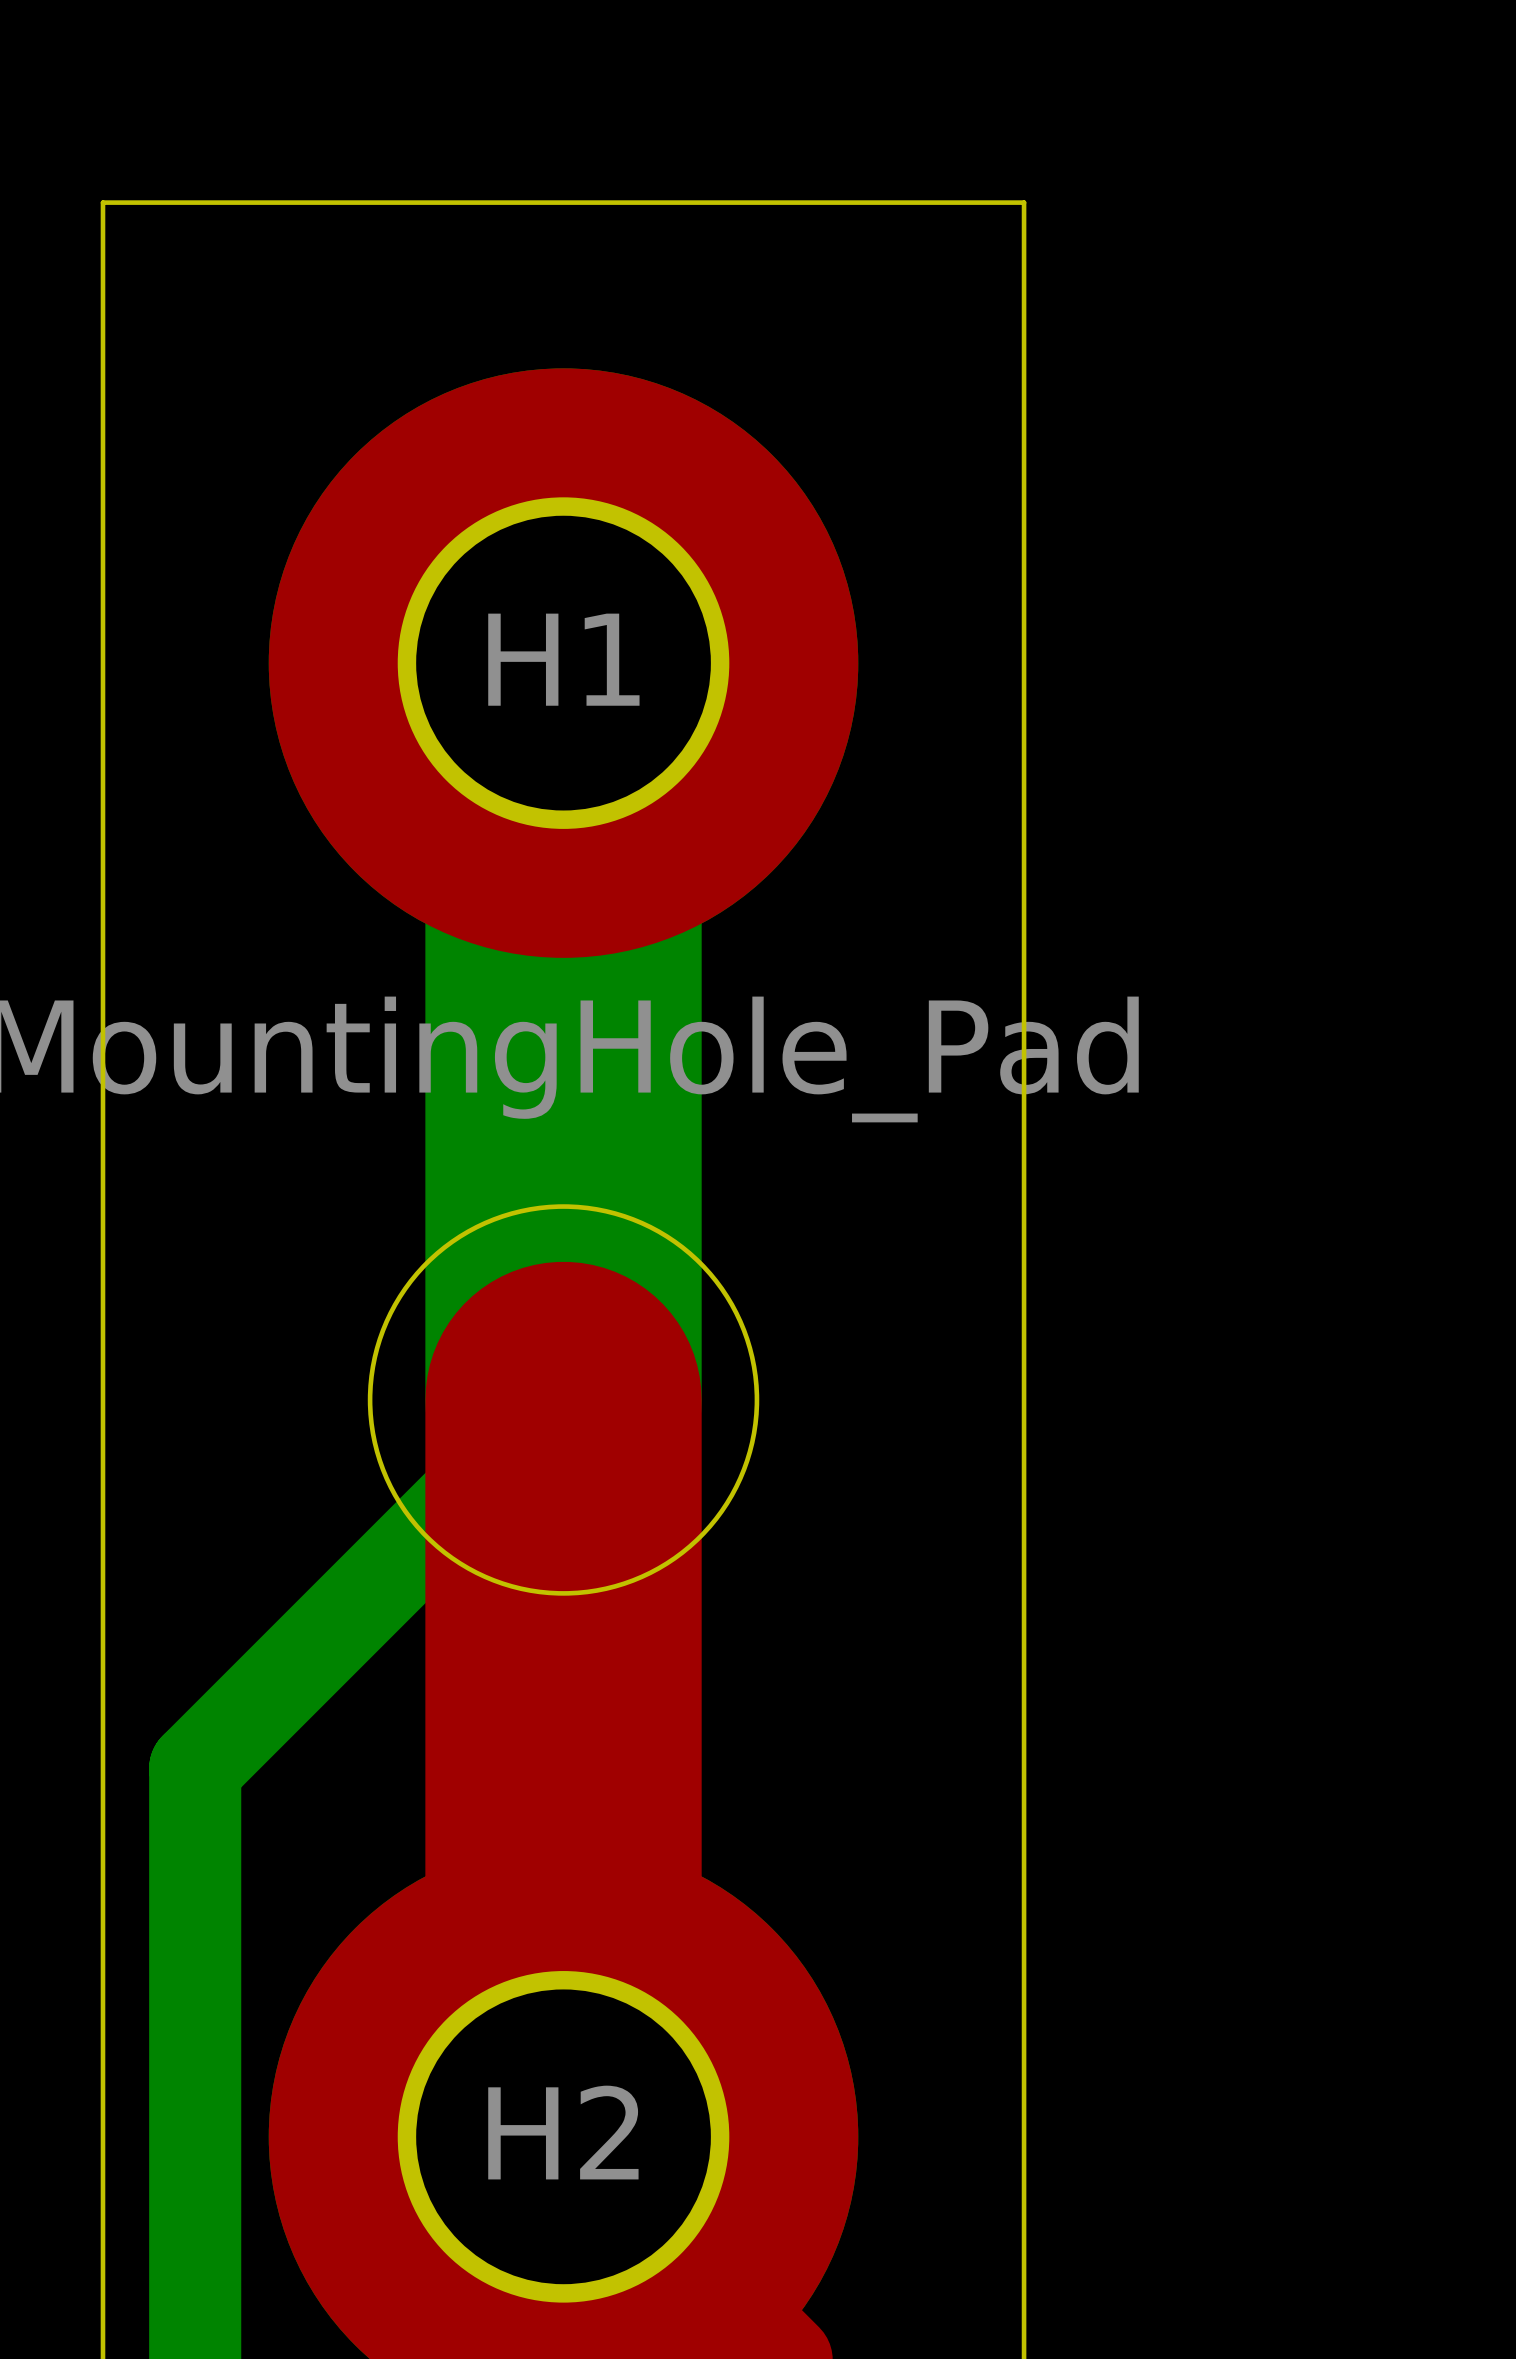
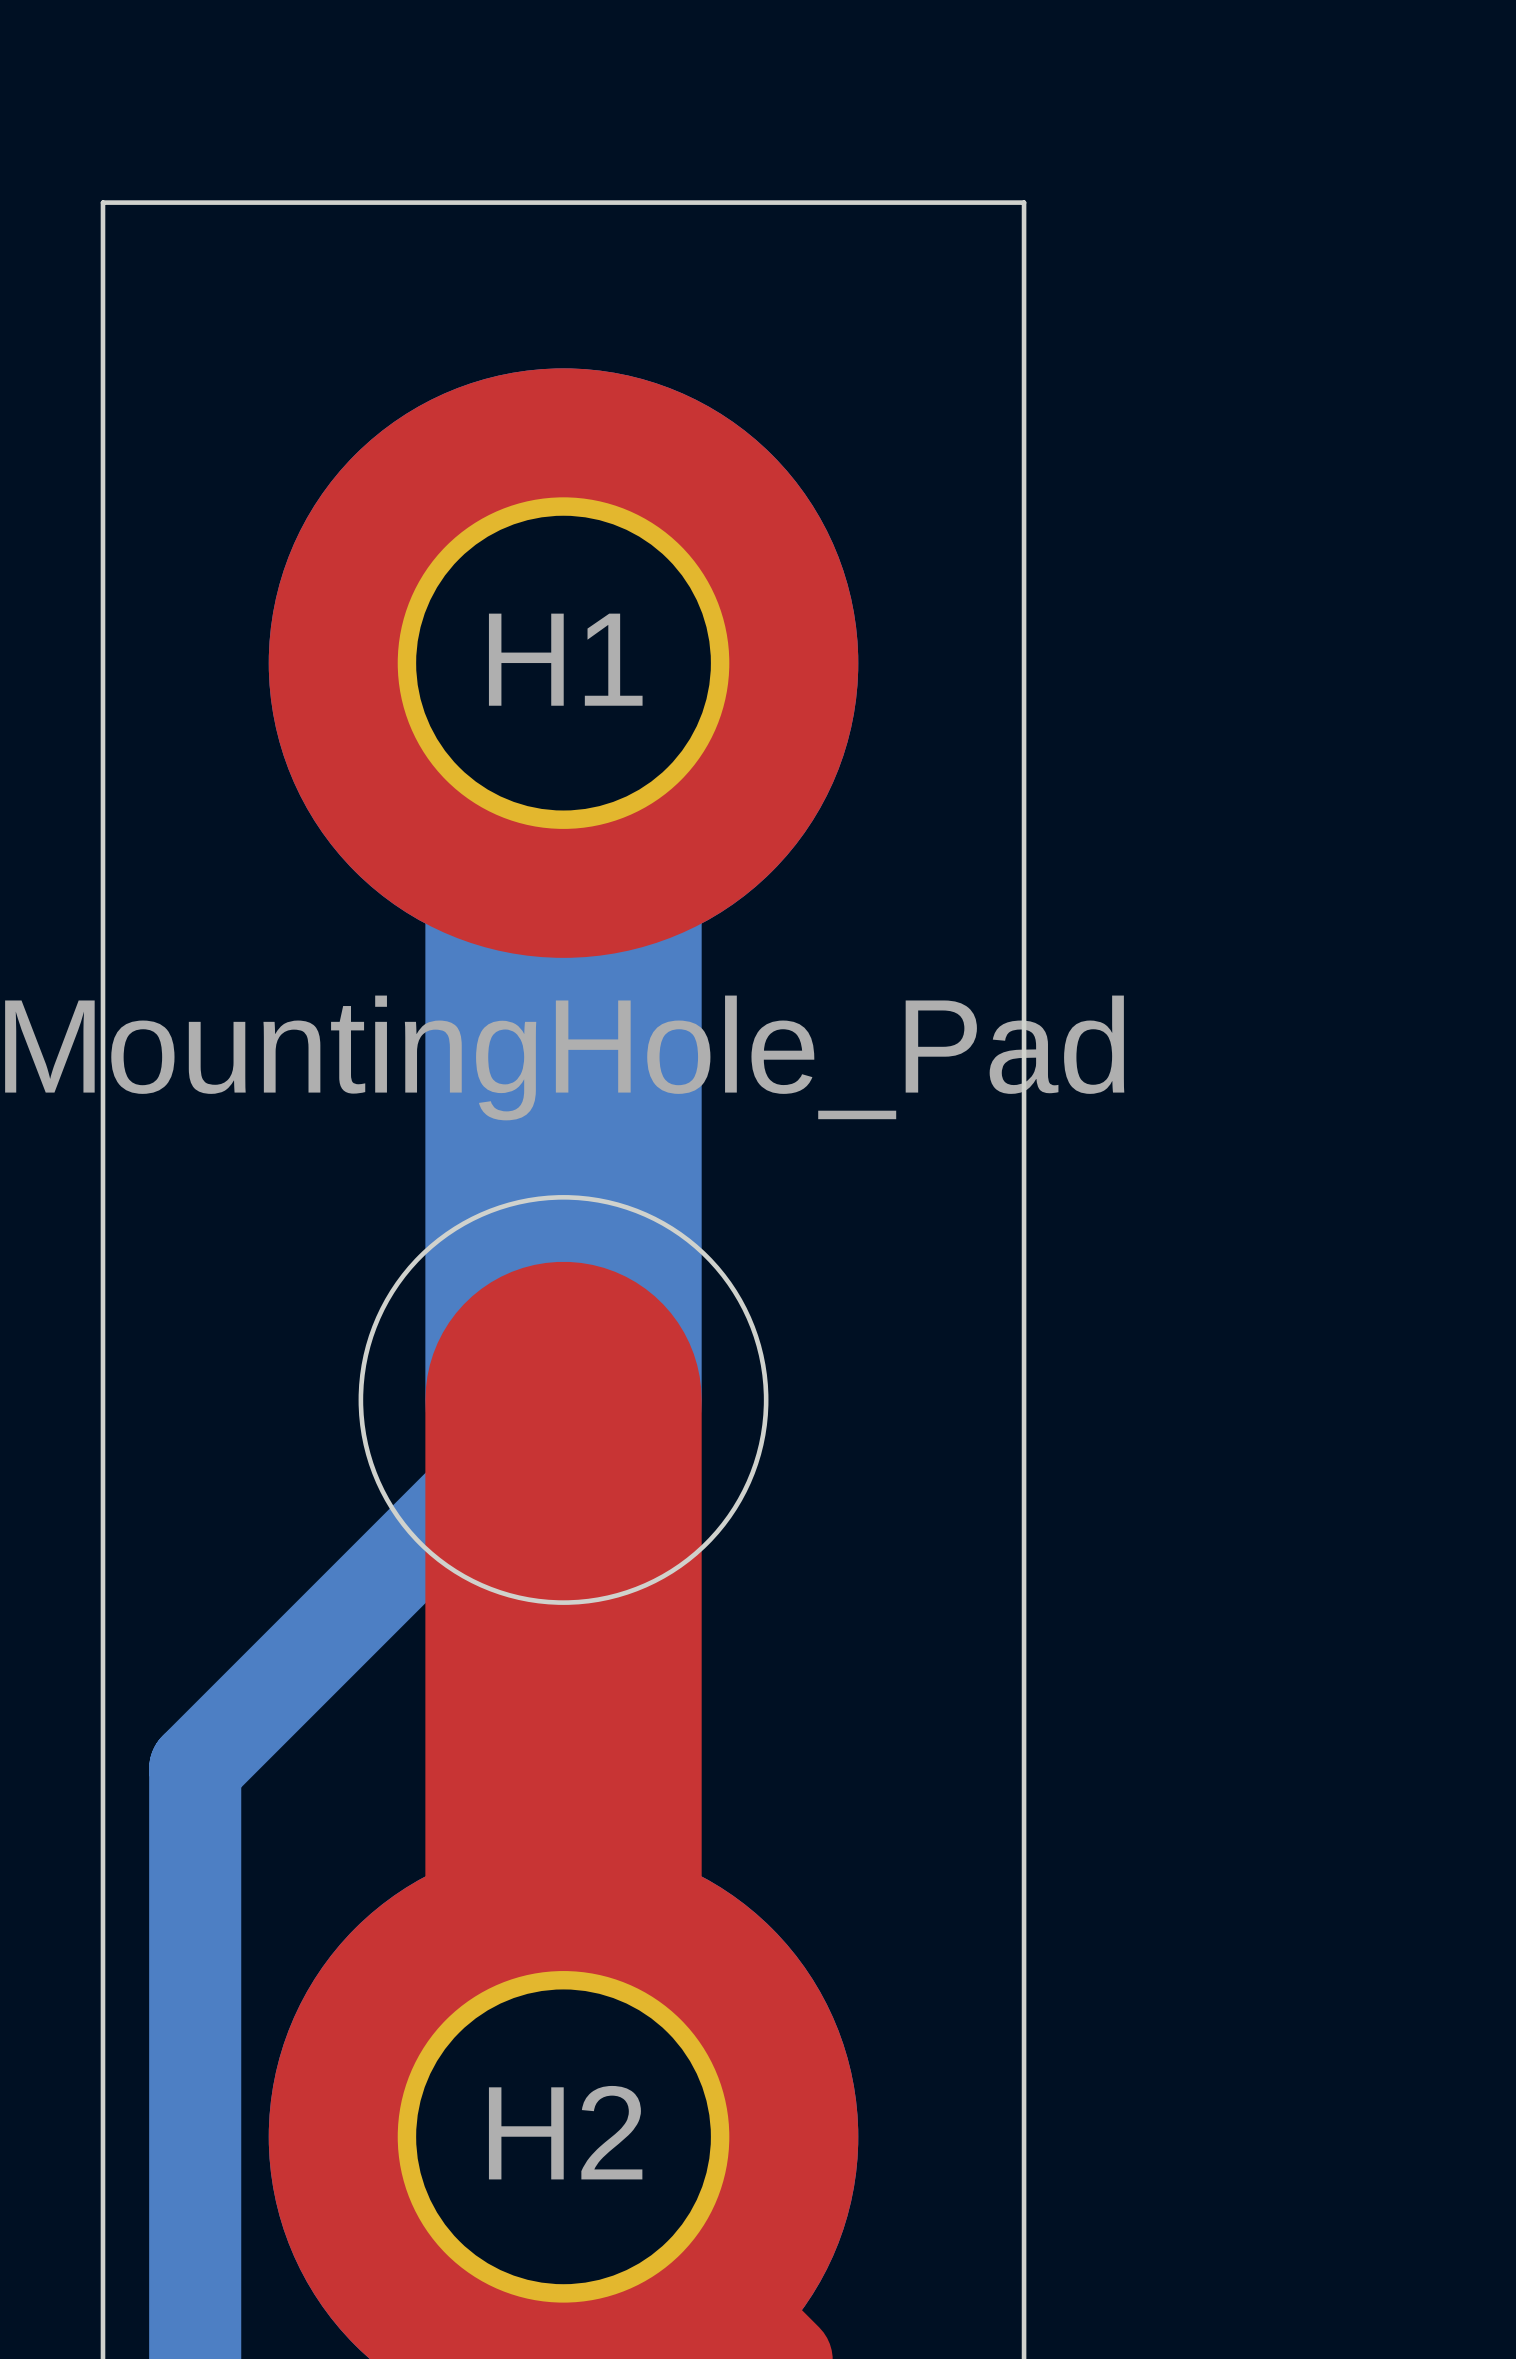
round board edge size: [367, 1204, 760, 1596] -> [358, 1195, 769, 1605]

